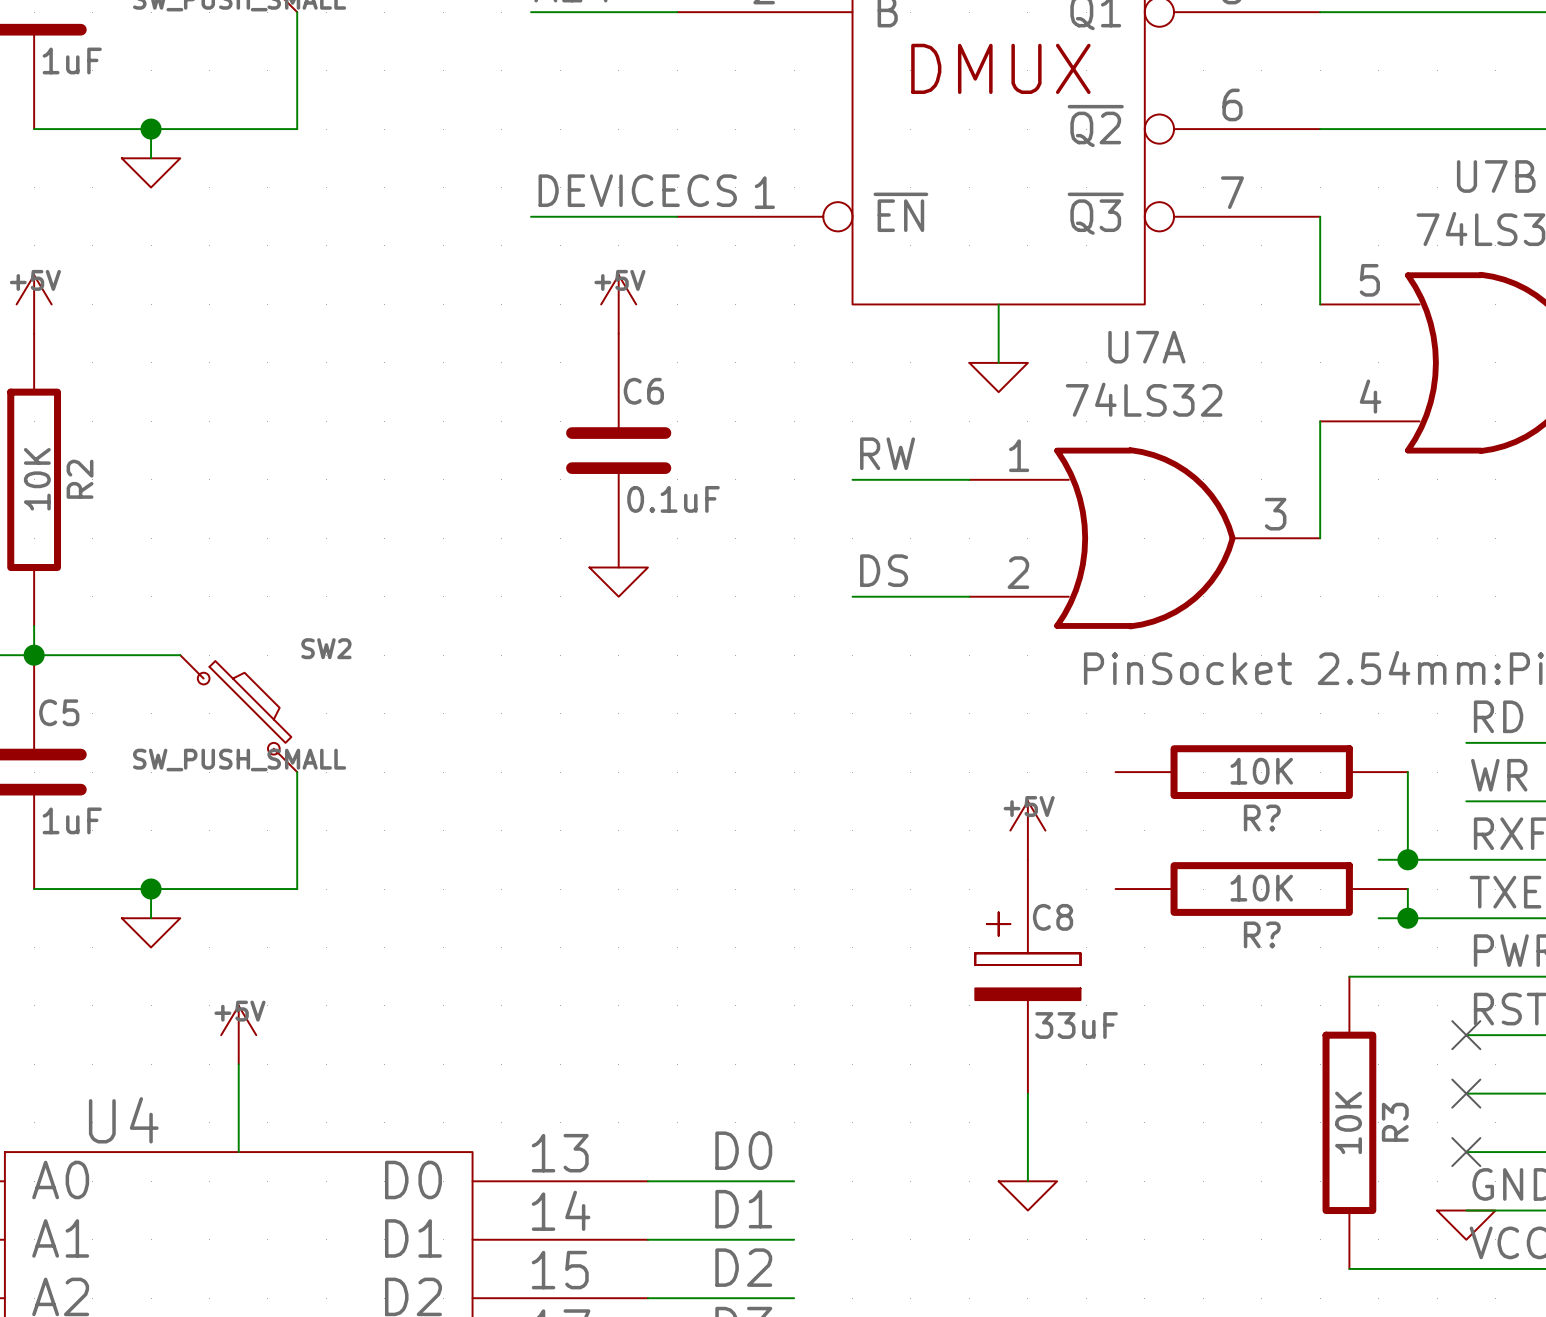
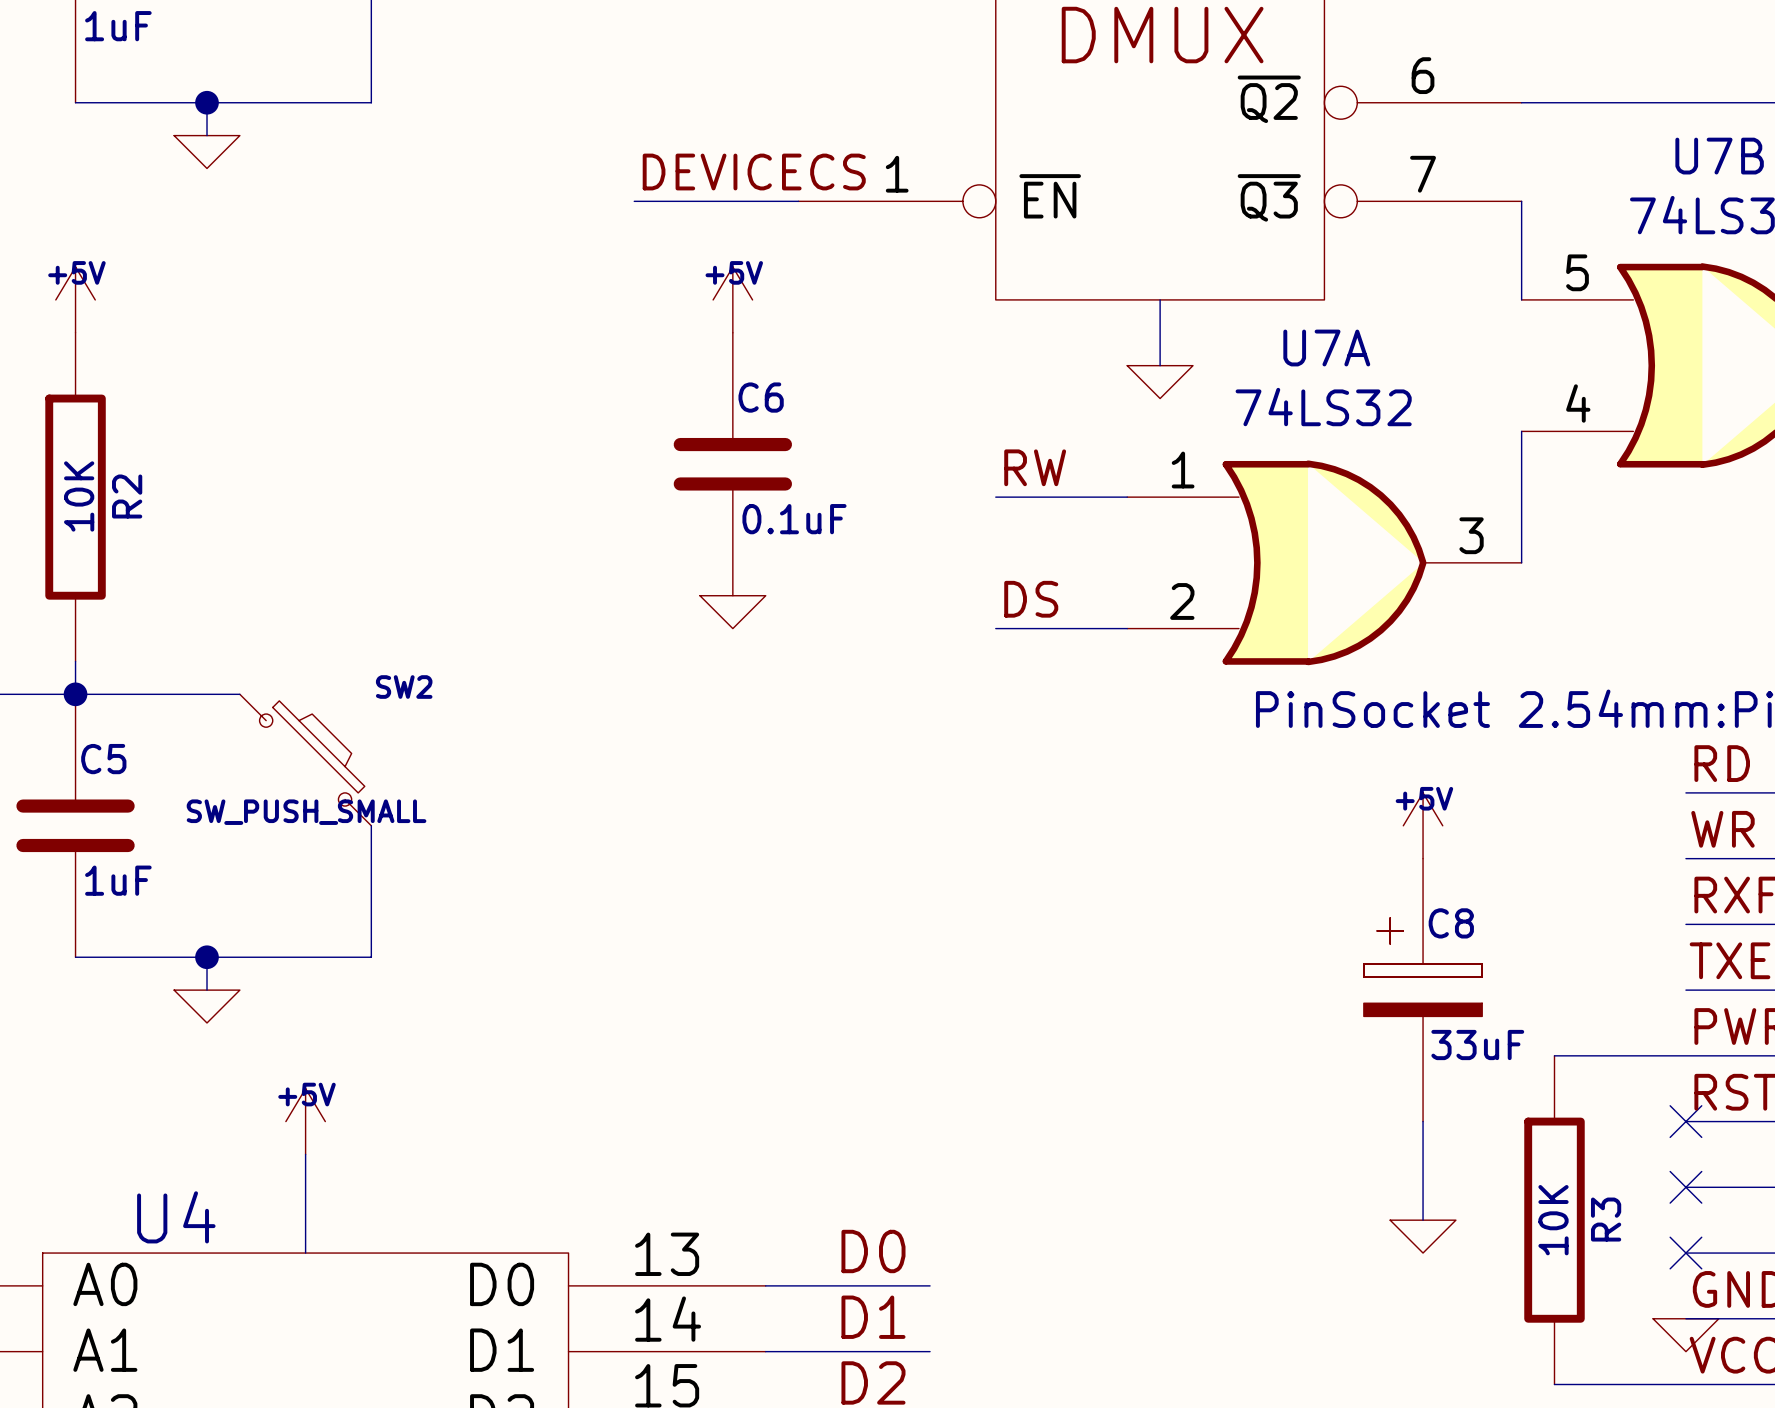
R?: 10K (1261, 772) -> none
wire: (1407, 772) (1407, 859) -> none
power symbol position: +5V (1027, 830) -> +5V (1423, 825)
wire: (1378, 859) (1466, 859) -> none
junction: (1407, 859) -> none
R?: 10K (1261, 889) -> none
wire: (1407, 889) (1407, 918) -> none
wire: (1378, 918) (1466, 918) -> none
junction: (1407, 918) -> none
C8 position: (1027, 976) -> (1423, 990)
wire: (1027, 1093) (1027, 1181) -> (1423, 1121) (1423, 1220)
power symbol position: (1027, 1195) -> (1423, 1236)

